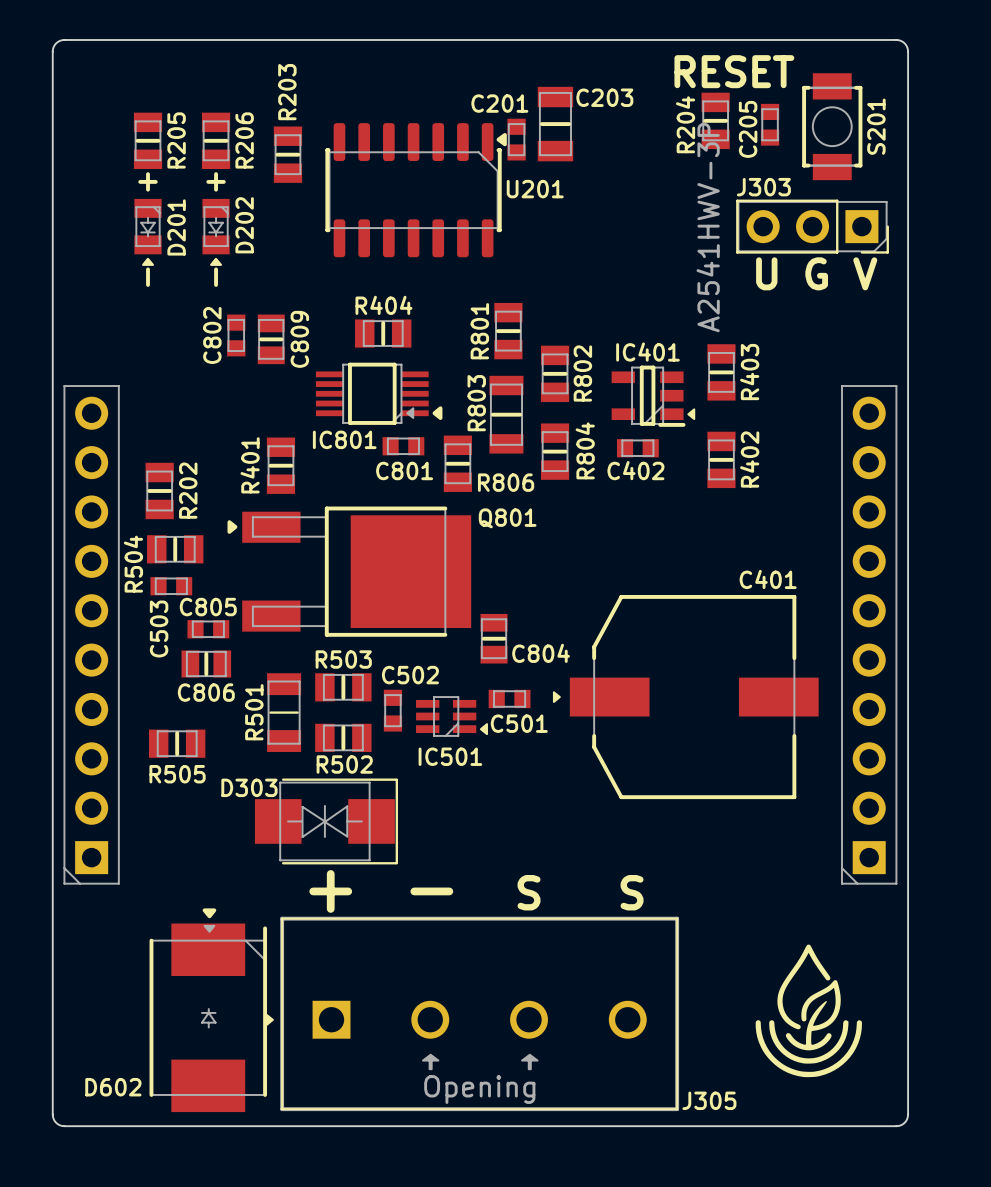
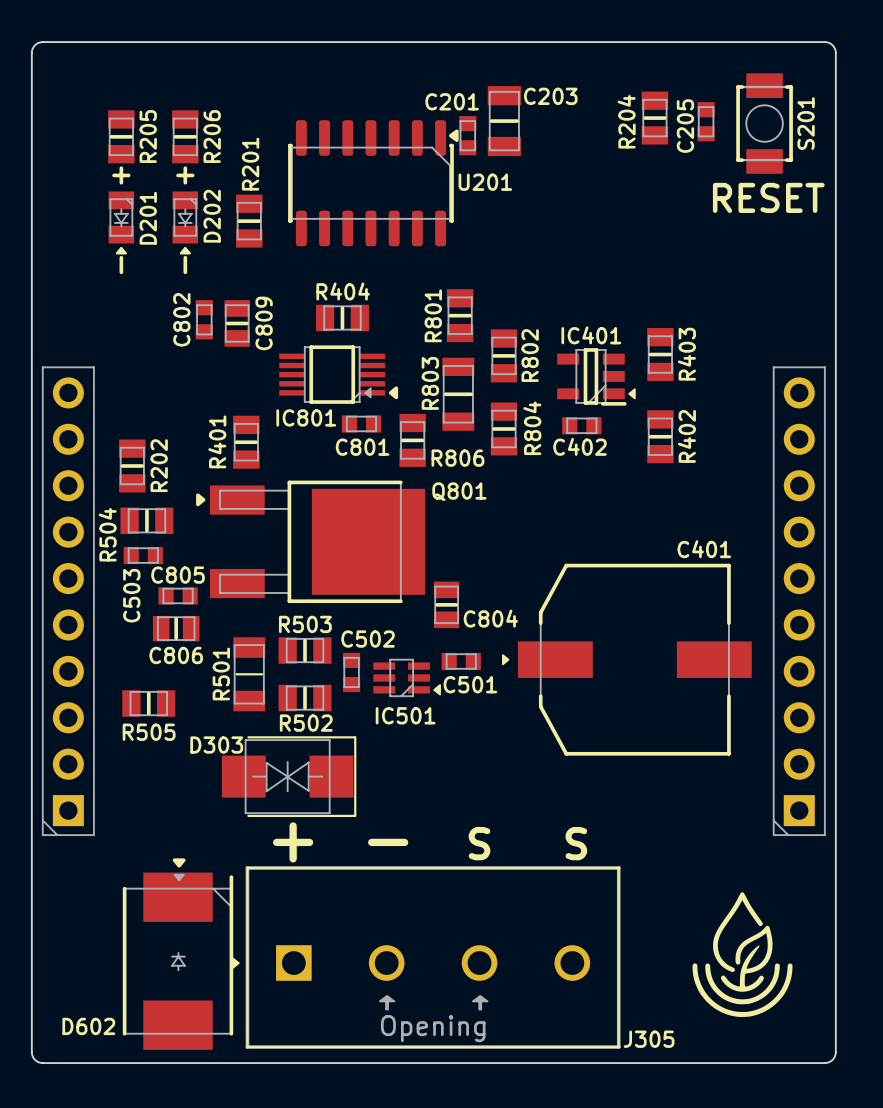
text position: RESET (734, 71) -> RESET (768, 197)
R203: (287, 154) -> none
J303: A2541HWV-3P (812, 226) -> none
R201: none -> (249, 221)
text: U (766, 273) -> none
text: G (816, 273) -> none
text: V (865, 273) -> none

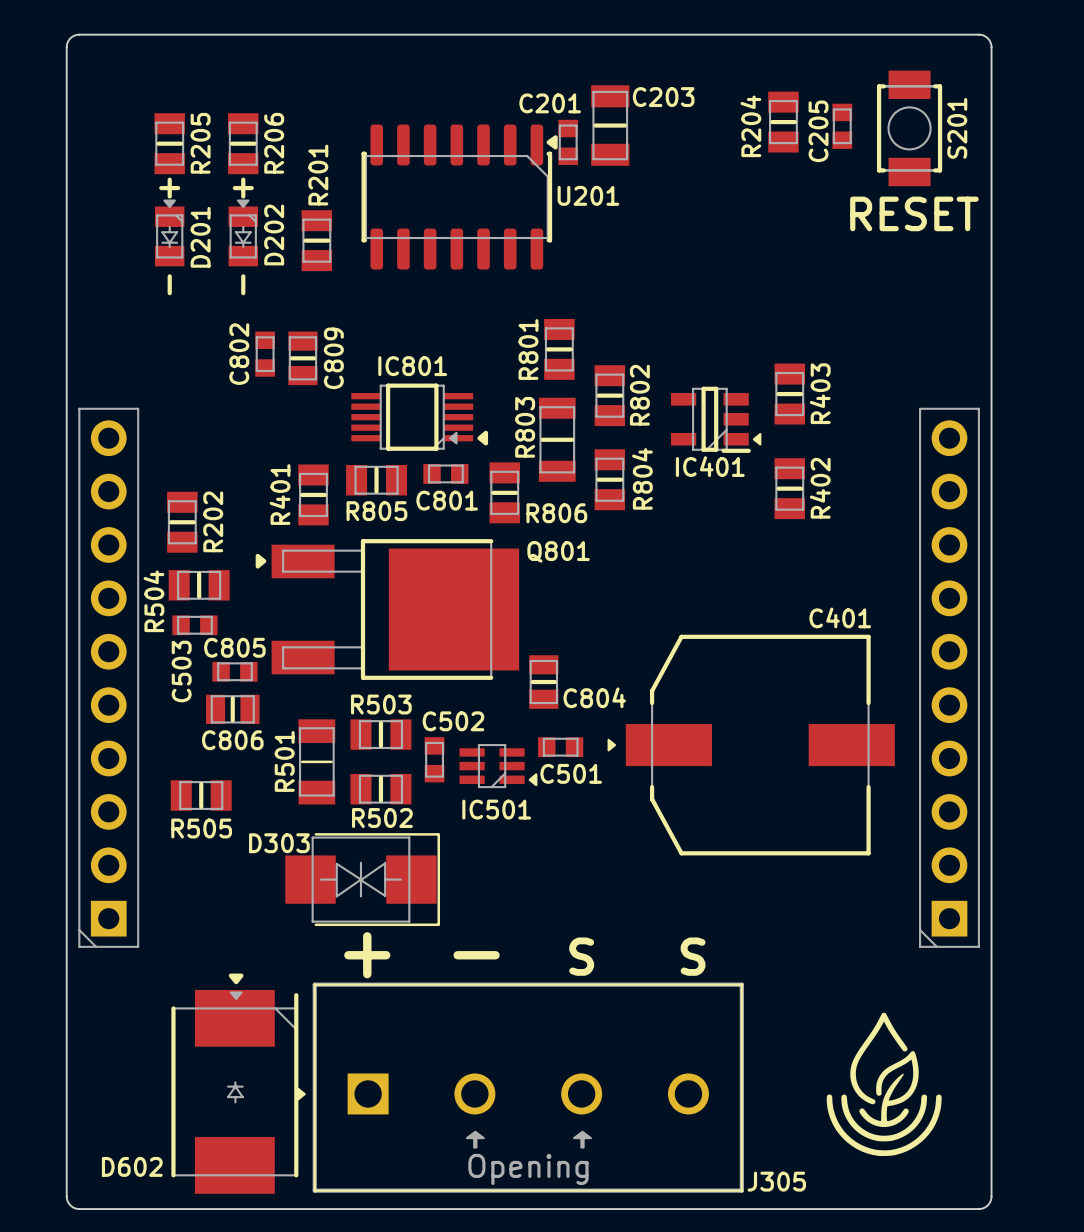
D201 footprint: [108, 166, 135, 275] -> [155, 177, 185, 296]
D202 footprint: [172, 166, 199, 275] -> [228, 177, 258, 296]
R404: (342, 317) -> none
IC401 name position: IC401 (591, 335) -> IC401 (710, 466)
IC801 name position: IC801 (306, 417) -> IC801 (412, 366)
C402: (581, 425) -> none
R805: none -> (376, 480)

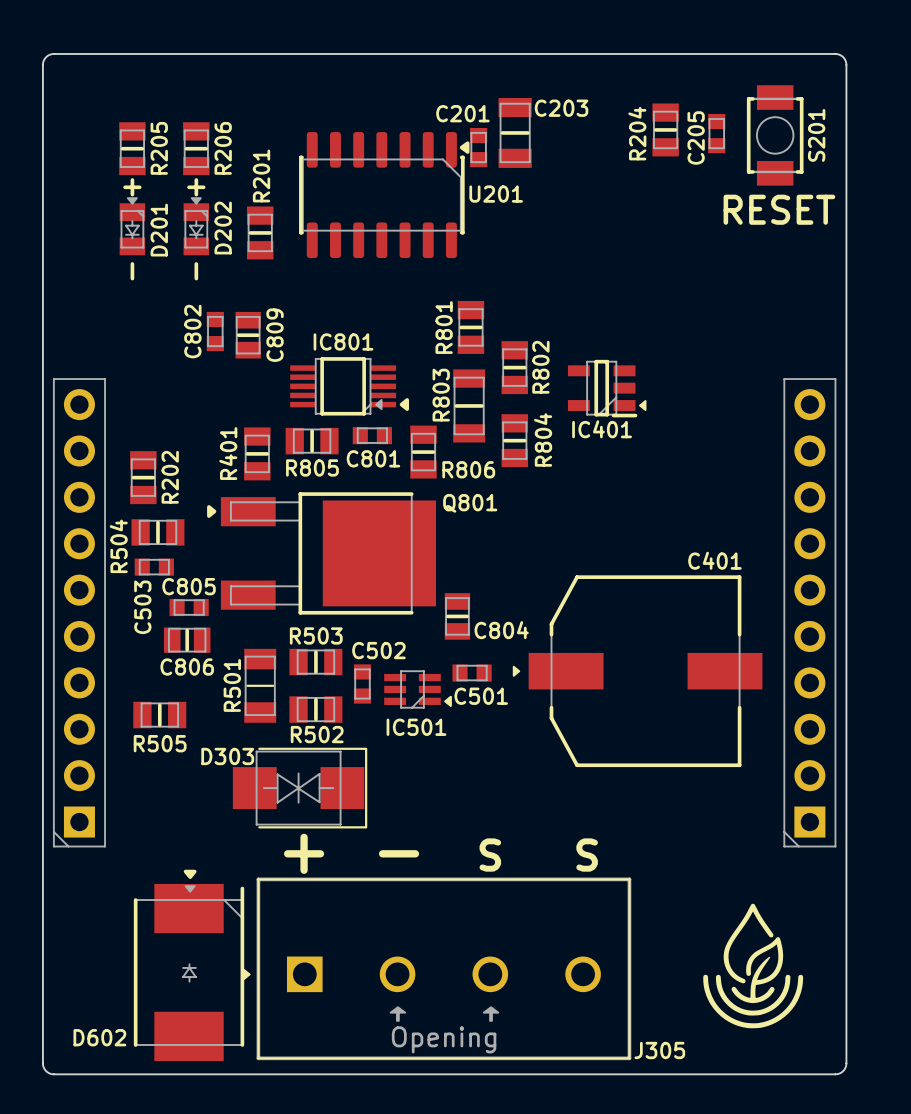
R403: (789, 394) -> none
R402: (789, 488) -> none

